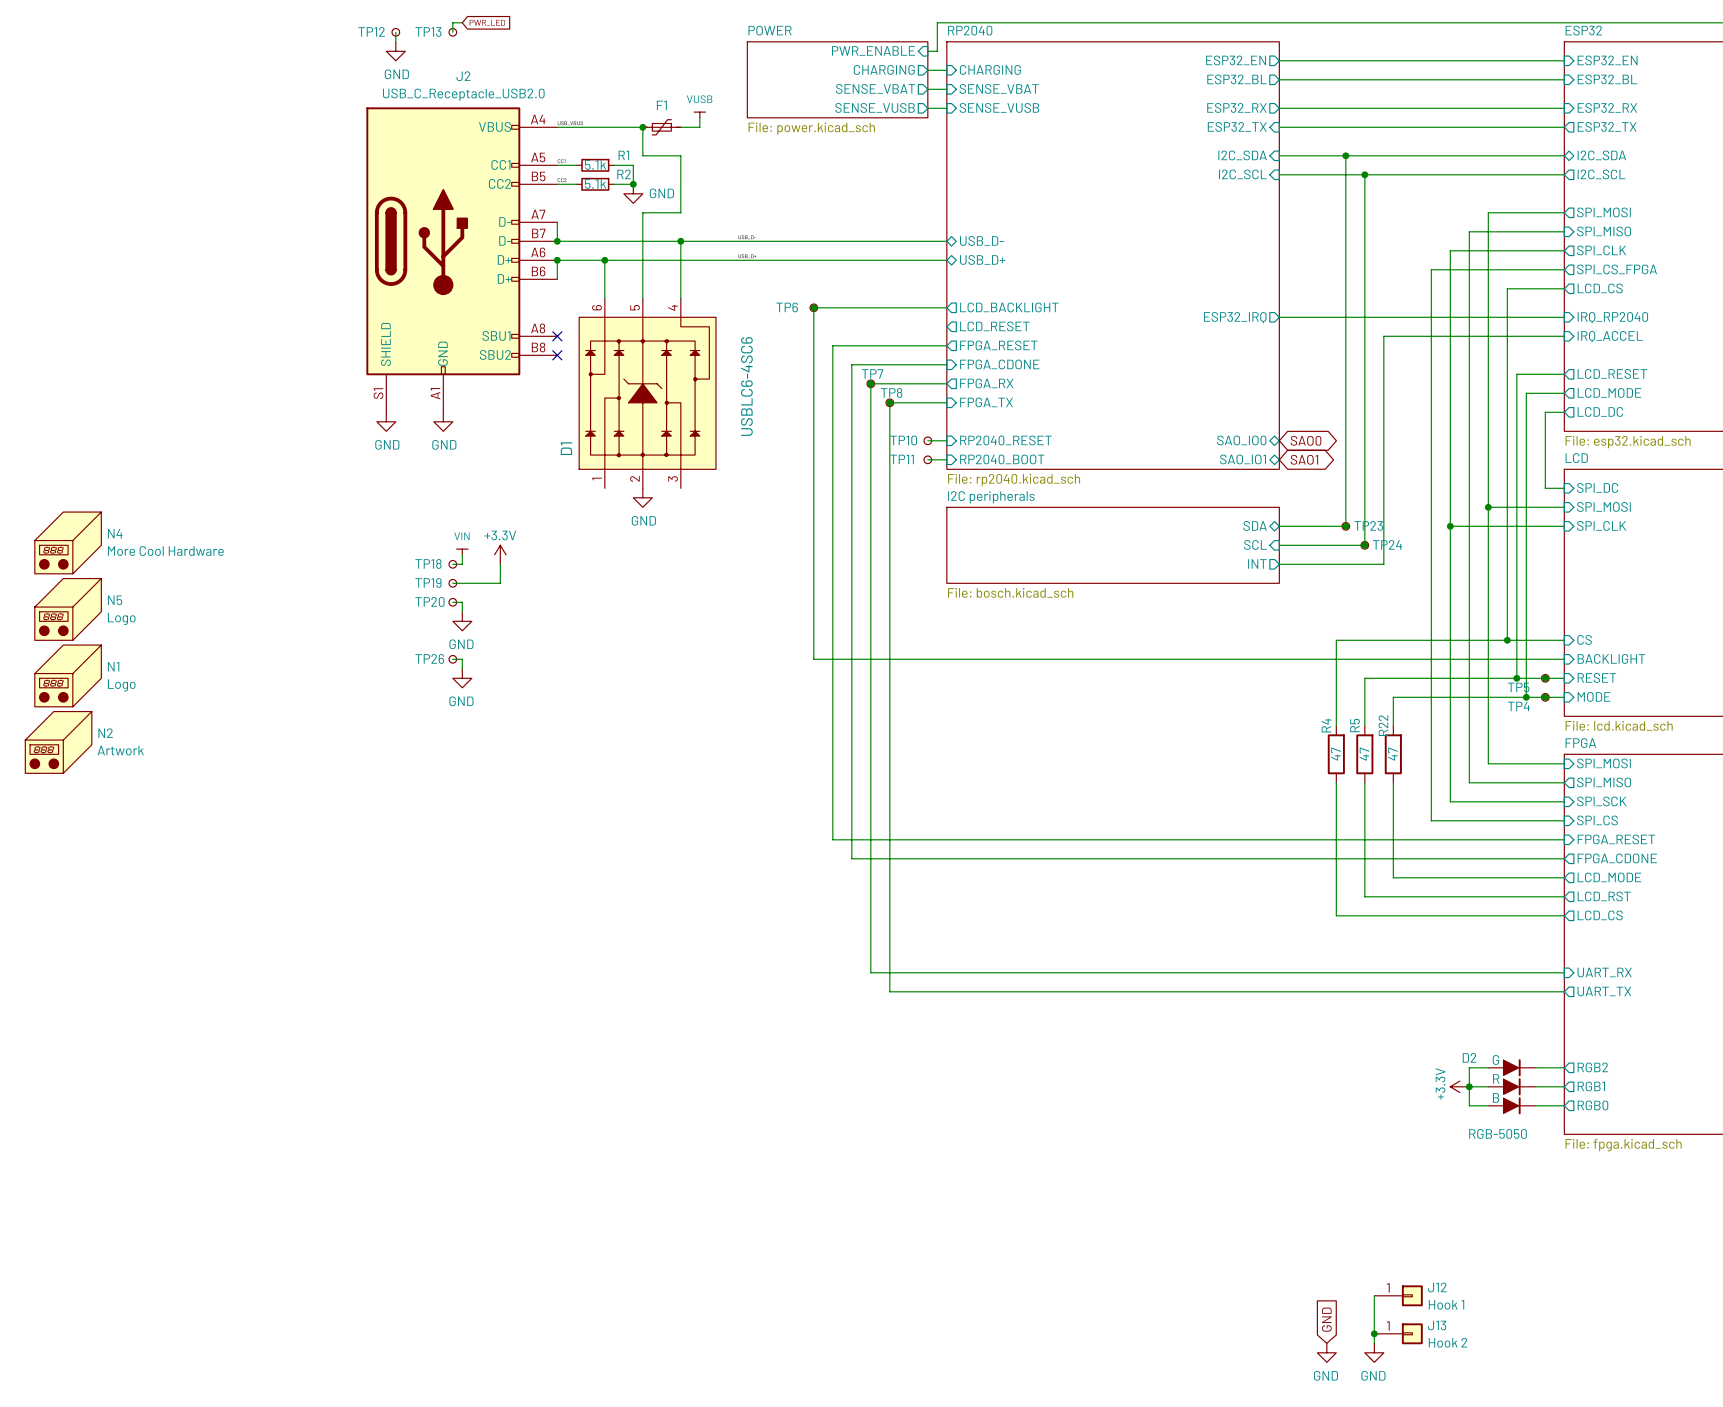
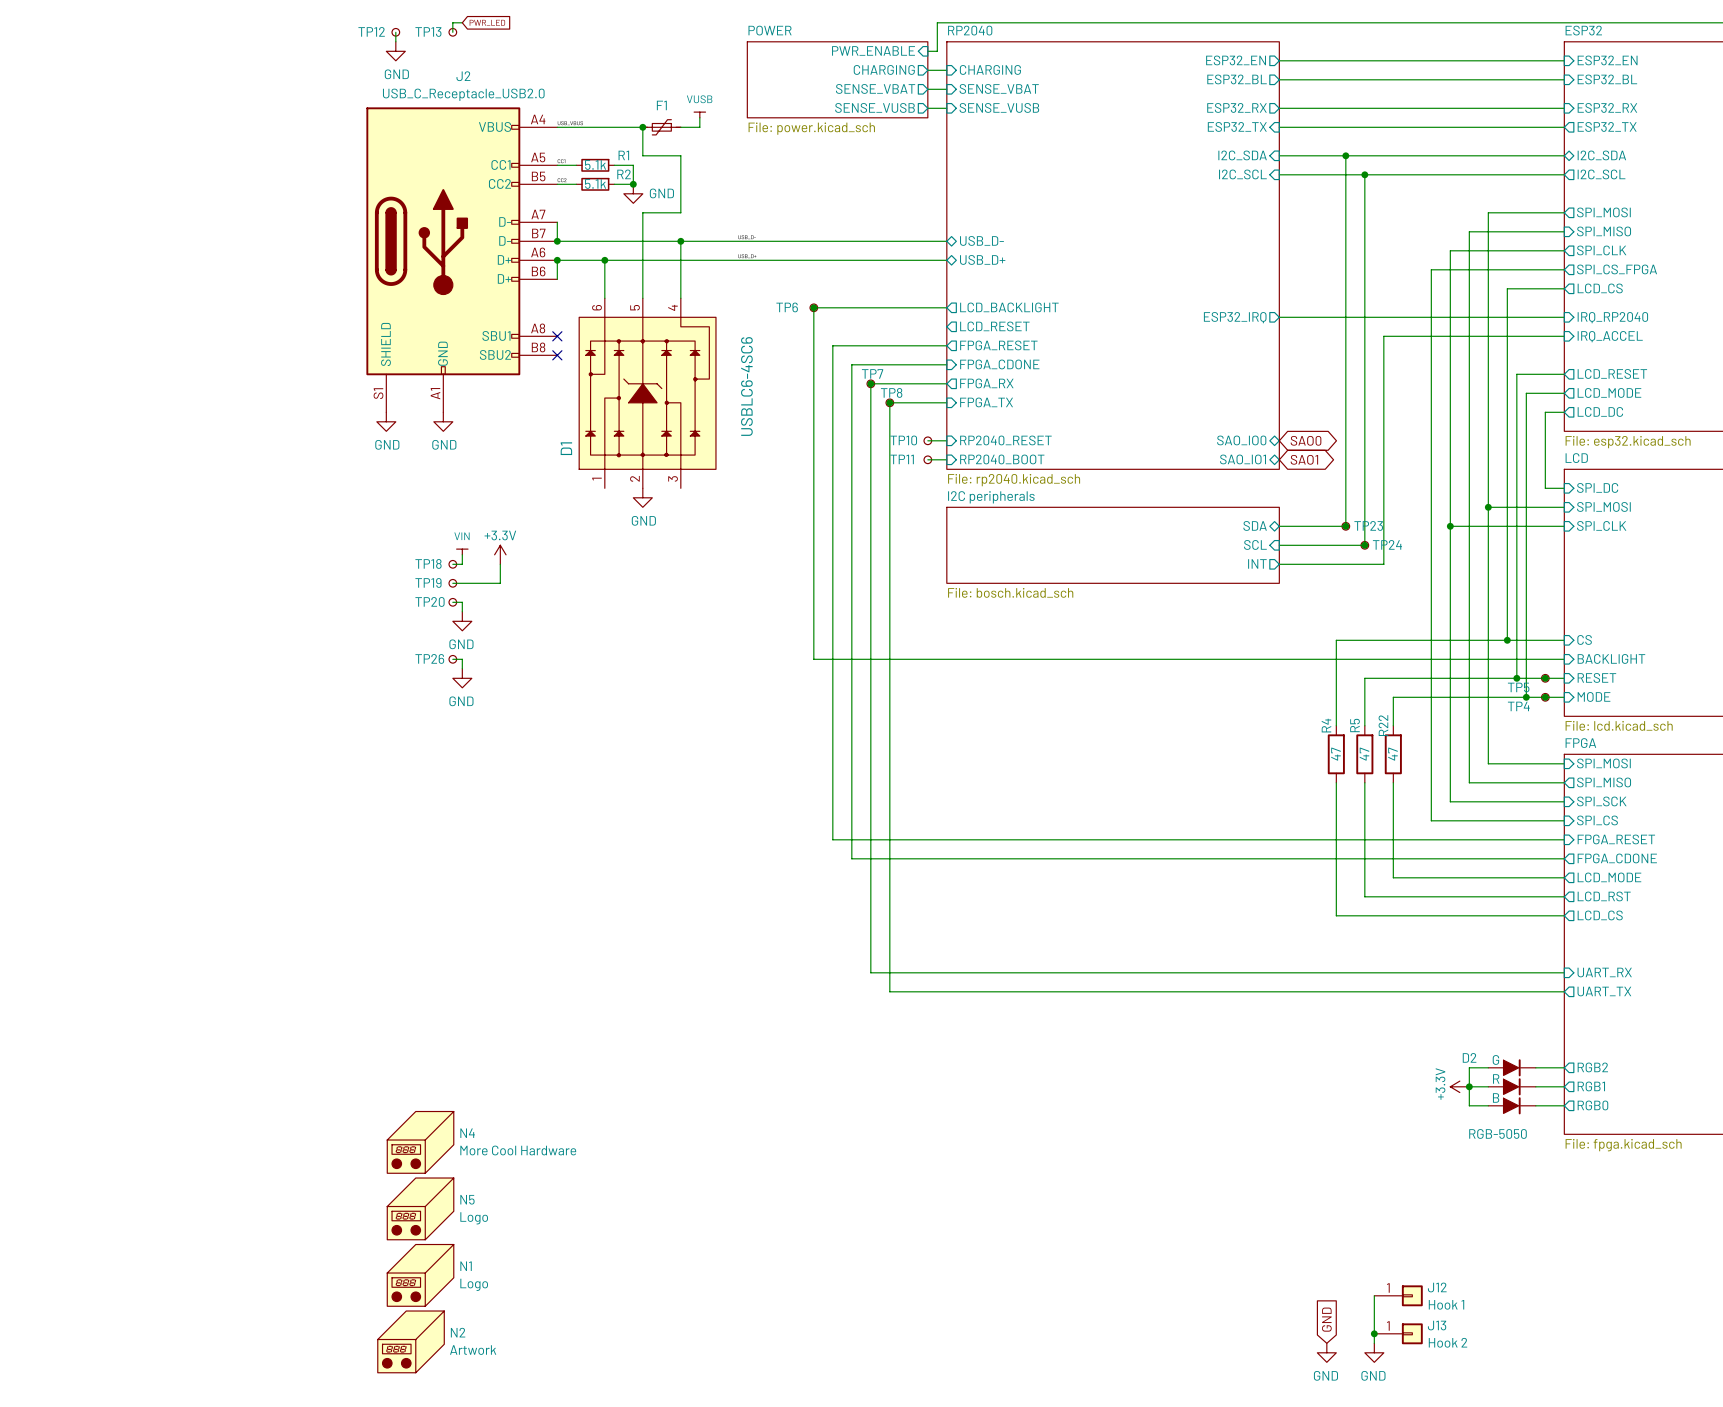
N4 position: (68, 542) -> (420, 1142)
N5 position: (68, 609) -> (420, 1208)
N1 position: (68, 675) -> (420, 1275)
N2 position: (58, 742) -> (411, 1341)

